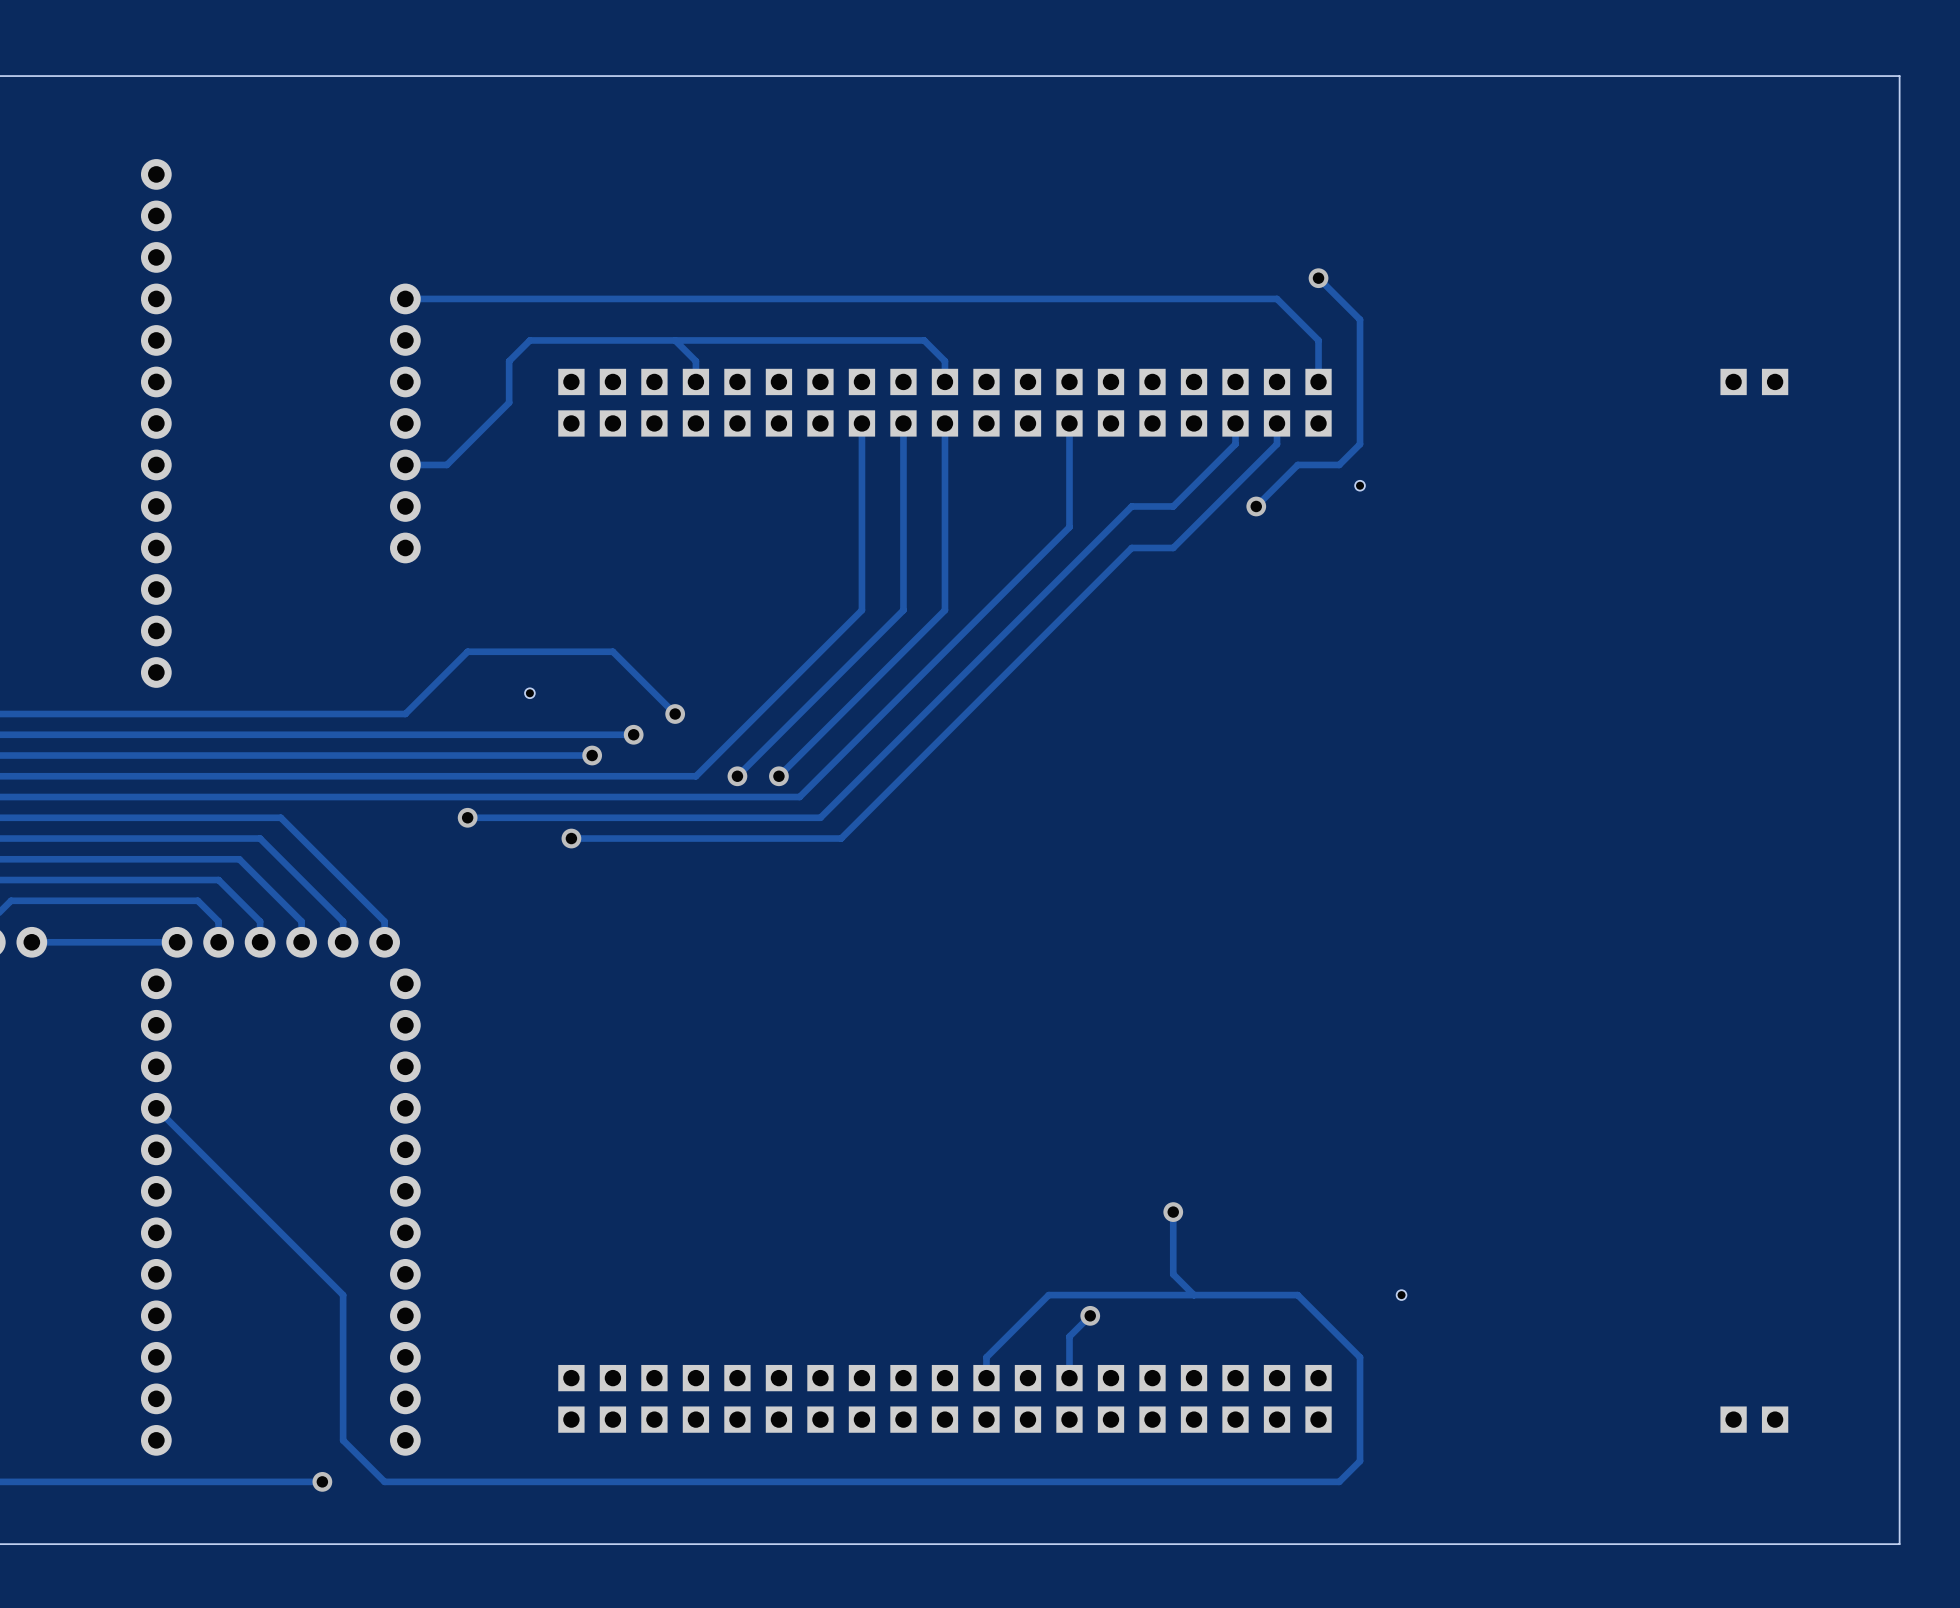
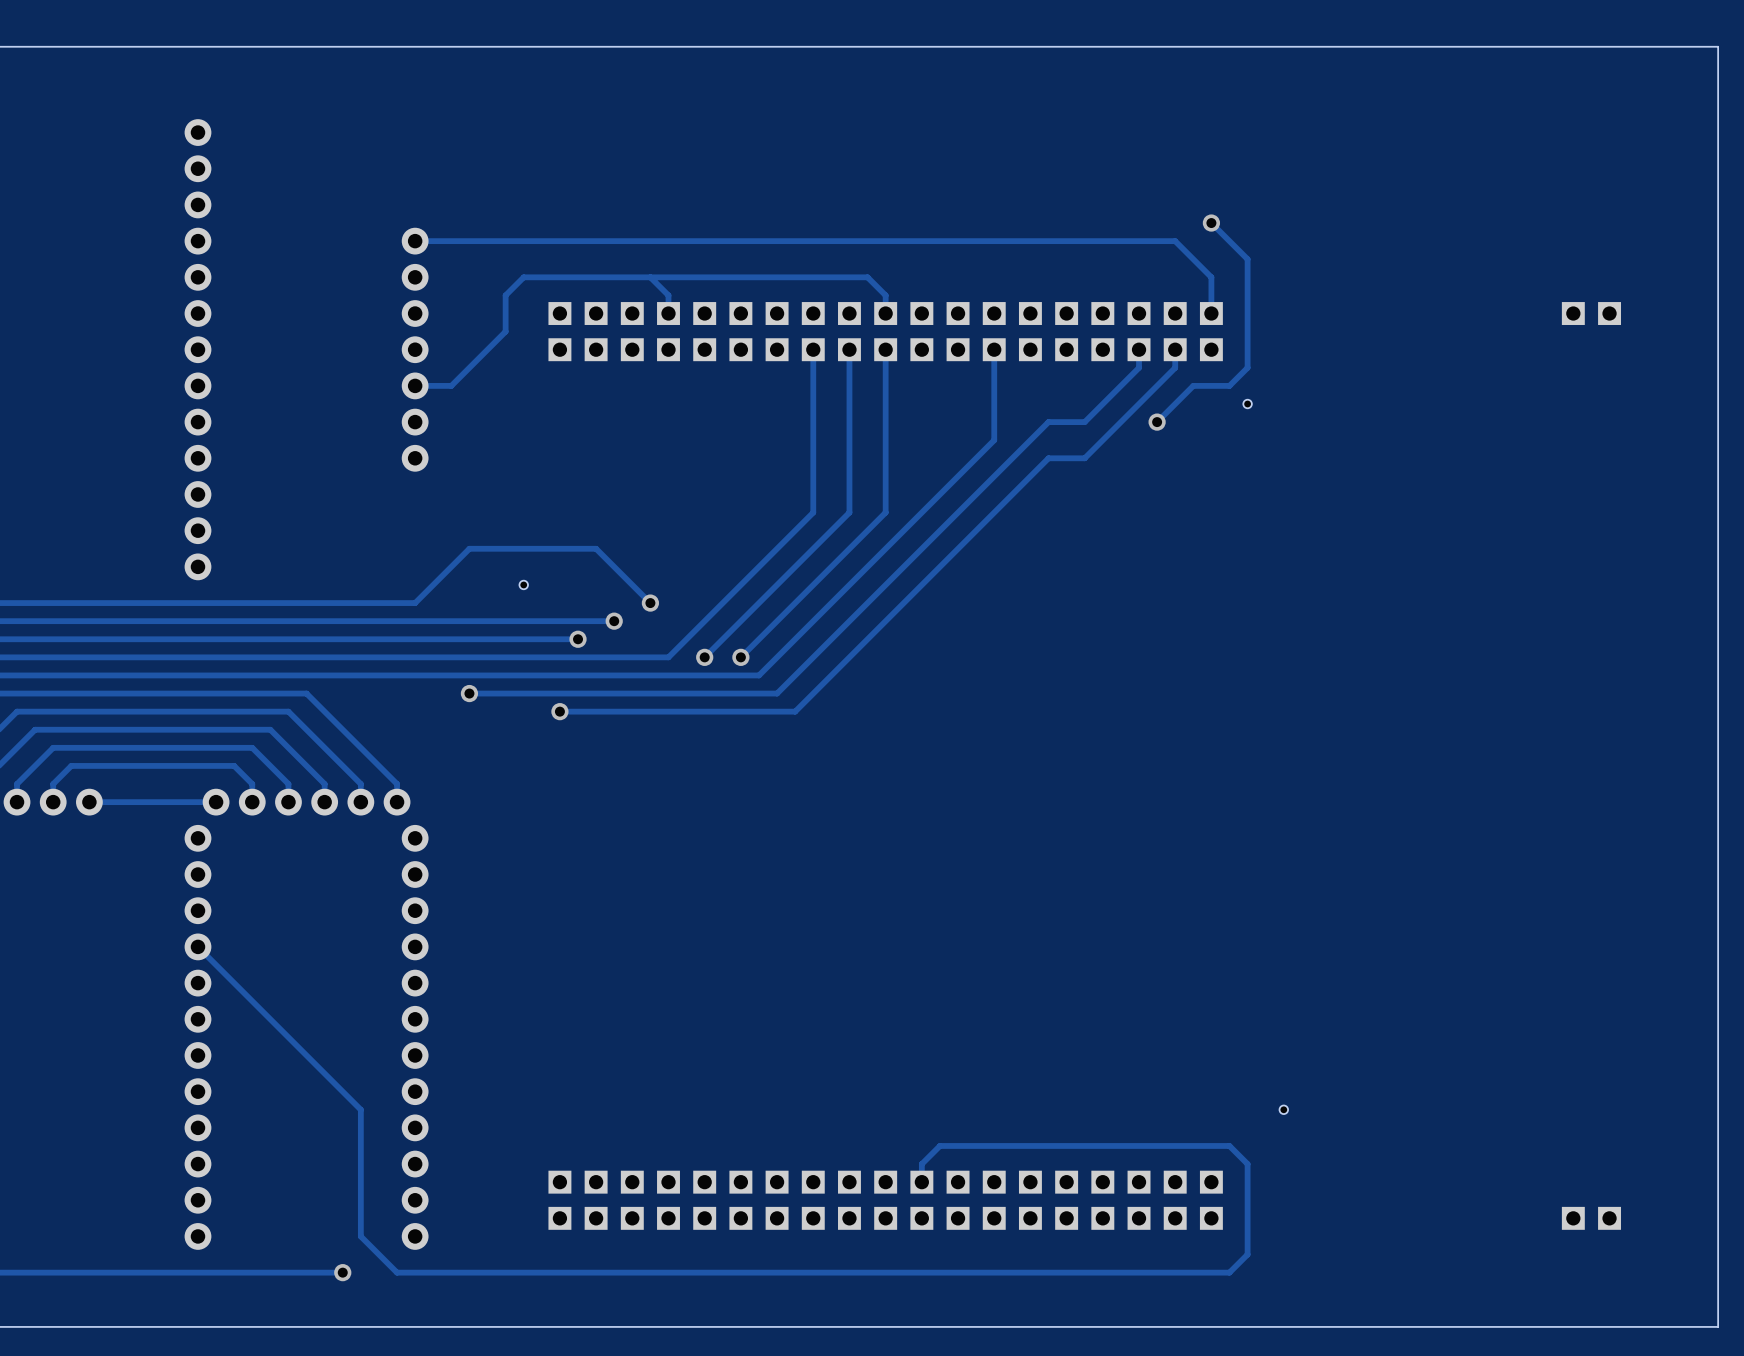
track: (1173, 1212) (1173, 1274) (1194, 1295) -> none
via: (1173, 1212) -> none
track: (1090, 1315) (1069, 1336) (1069, 1378) -> none
via: (1090, 1315) -> none
track: (1339, 1336) (1297, 1295) (1048, 1295) (1007, 1336) -> (1229, 1145) (939, 1145)

